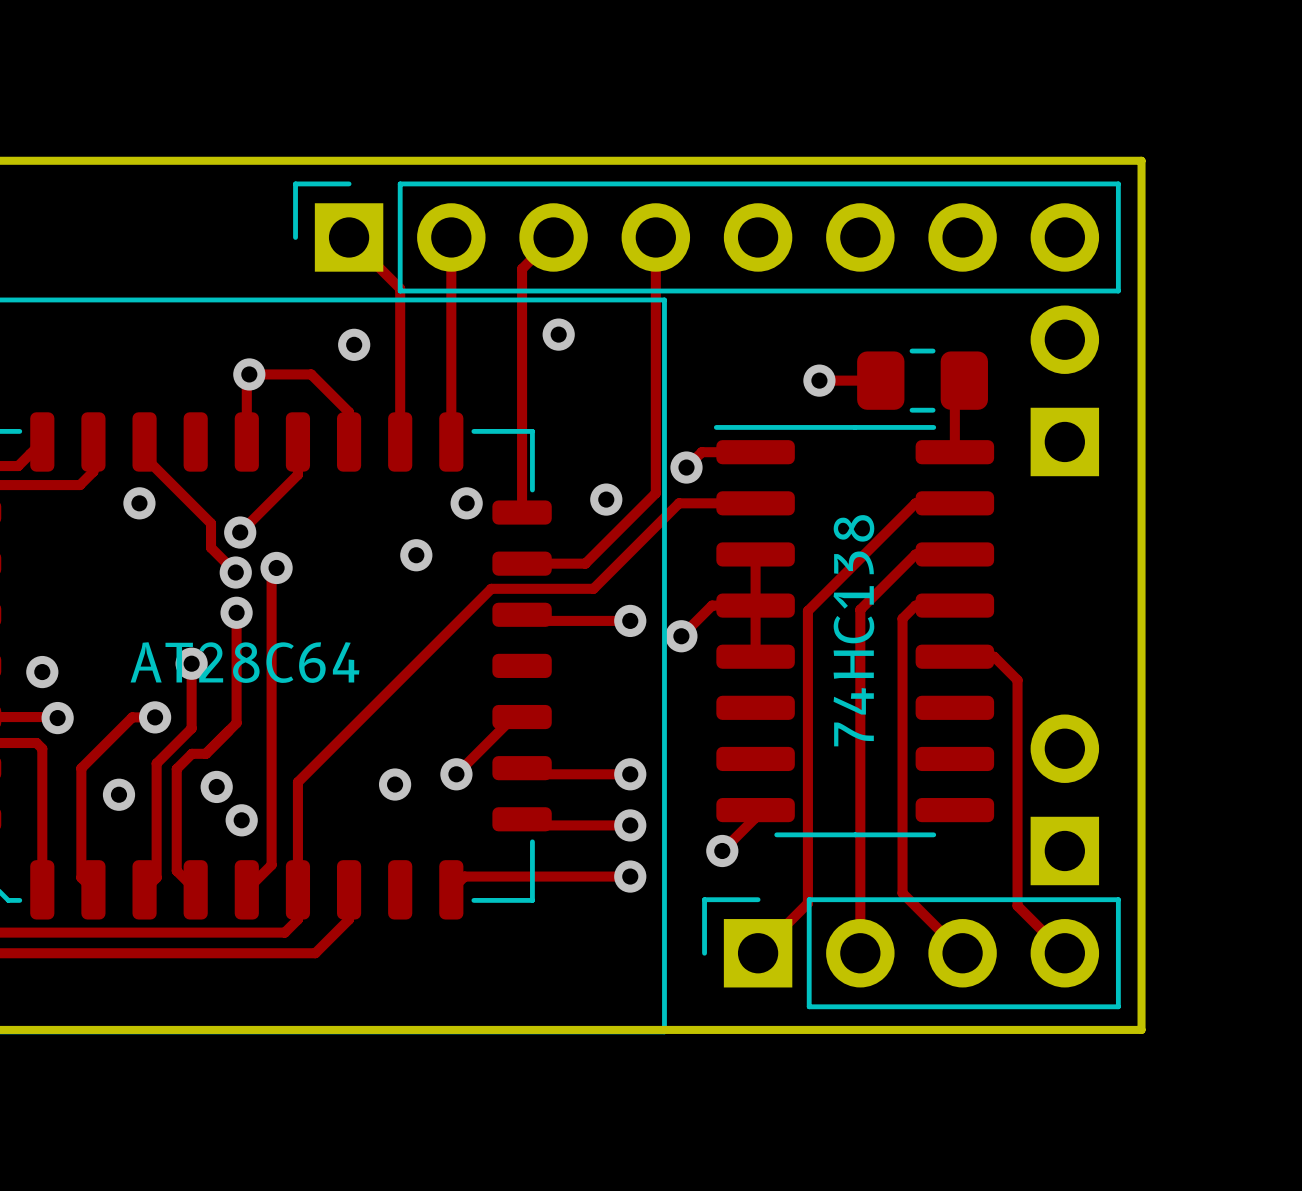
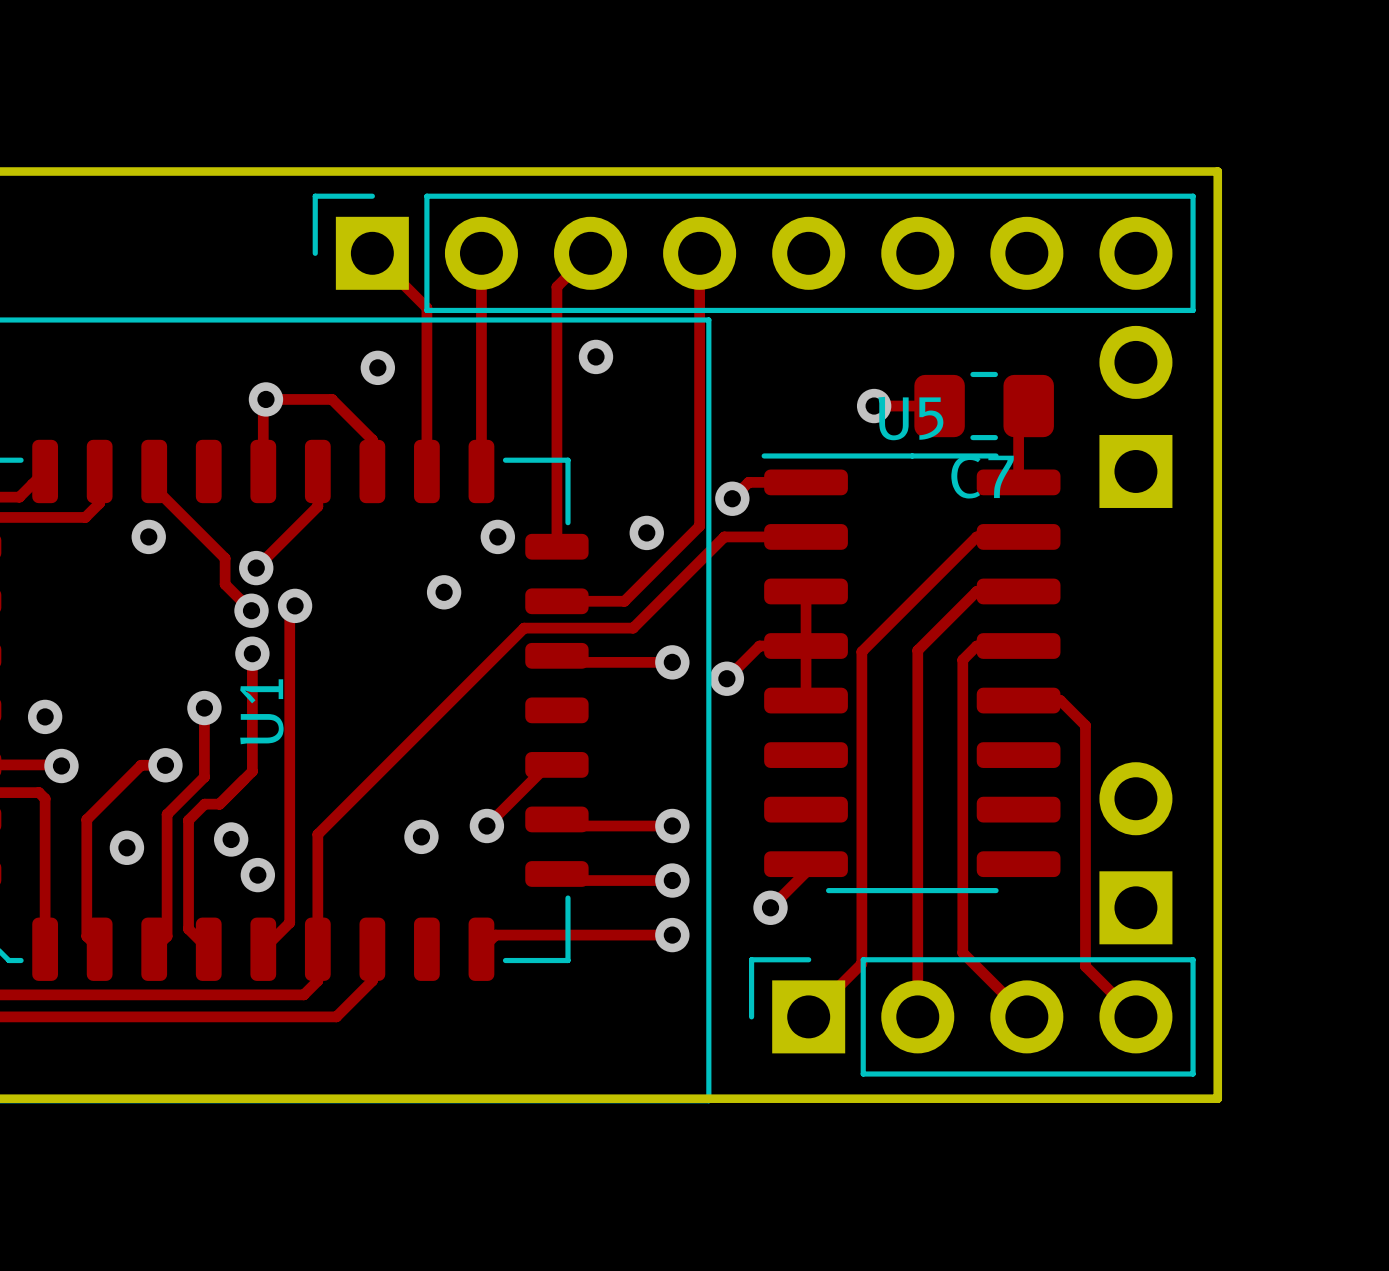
U5 name: none -> U5 (910, 418)
C7 name: none -> C7 (982, 476)
U5 value: 74HC138 (853, 630) -> none
U1 value: AT28C64 (244, 662) -> none
U1 name: none -> U1 (261, 711)

